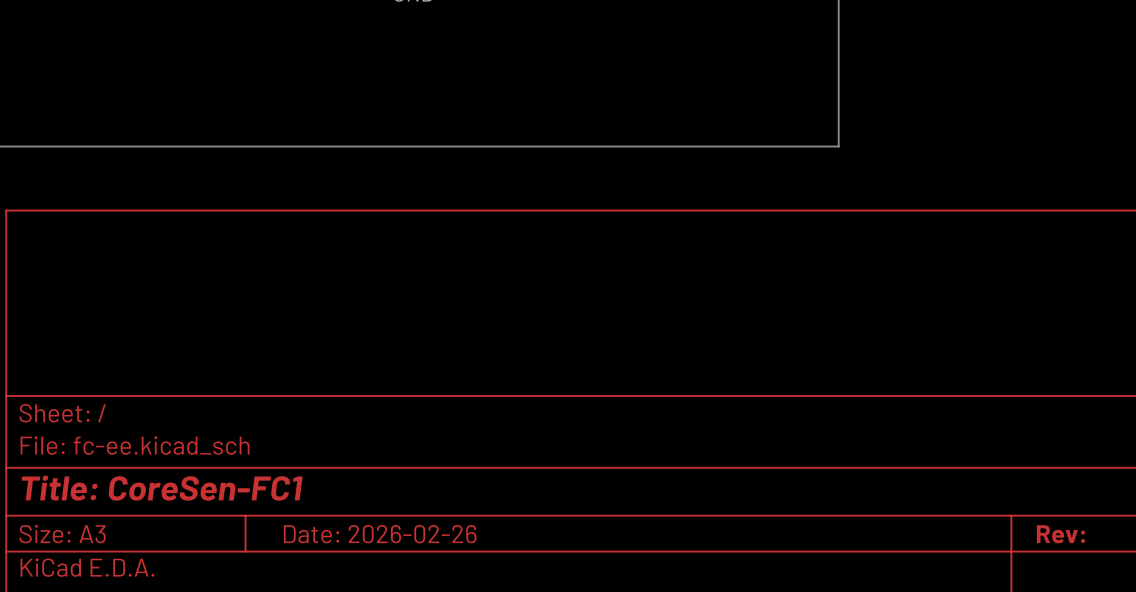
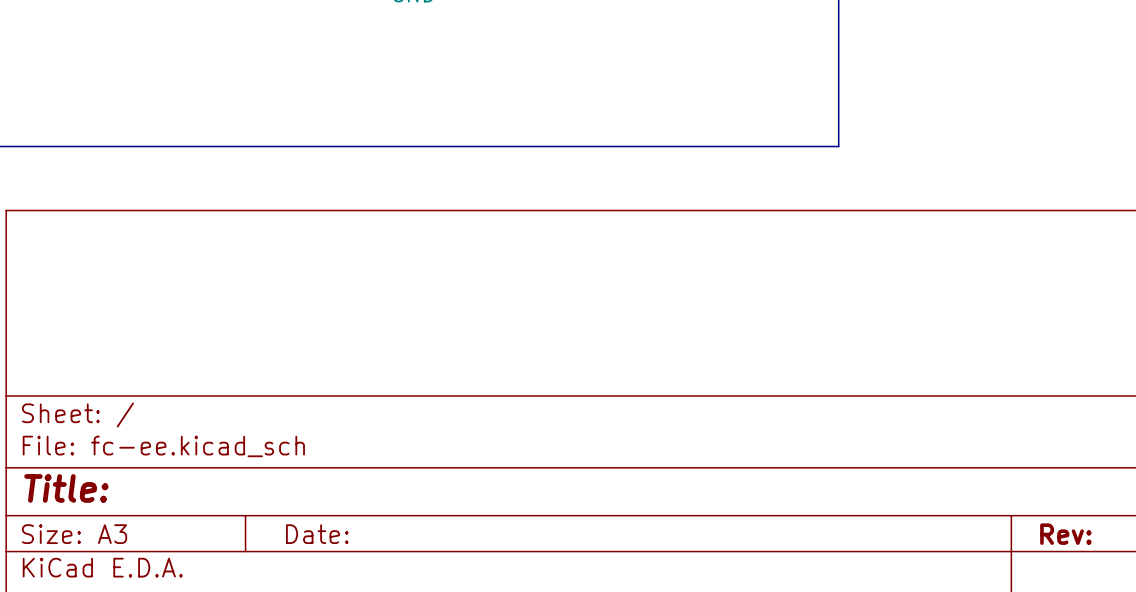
title block: Title: CoreSen-FC1 (162, 488) -> Title: (66, 488)
title block: Date: 2026-02-26 (380, 534) -> Date: (317, 534)

